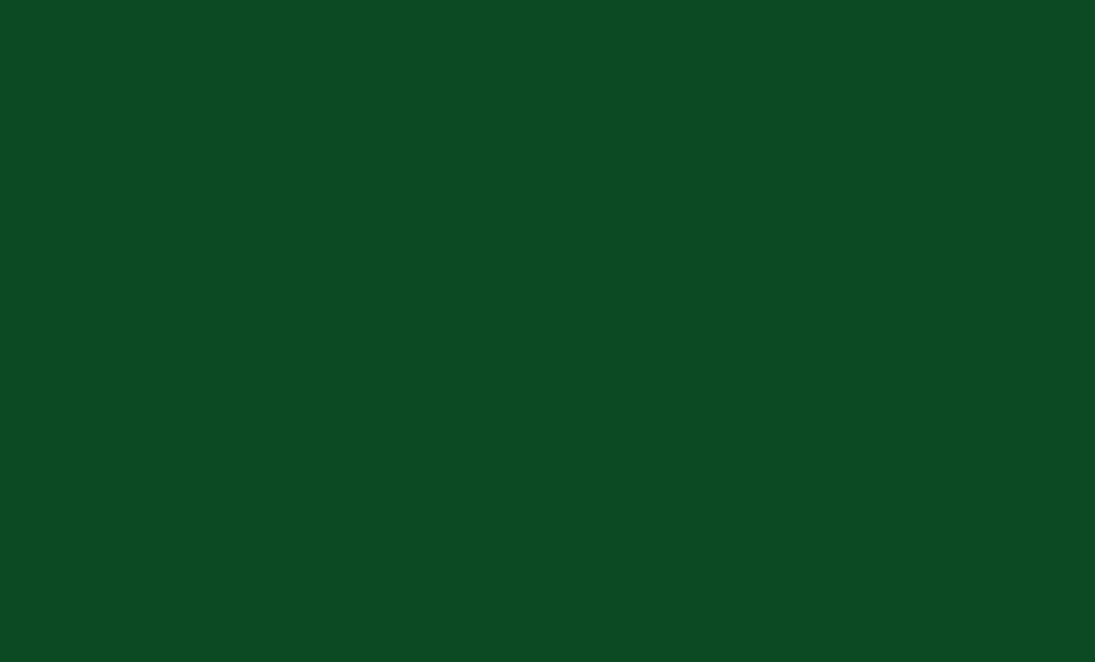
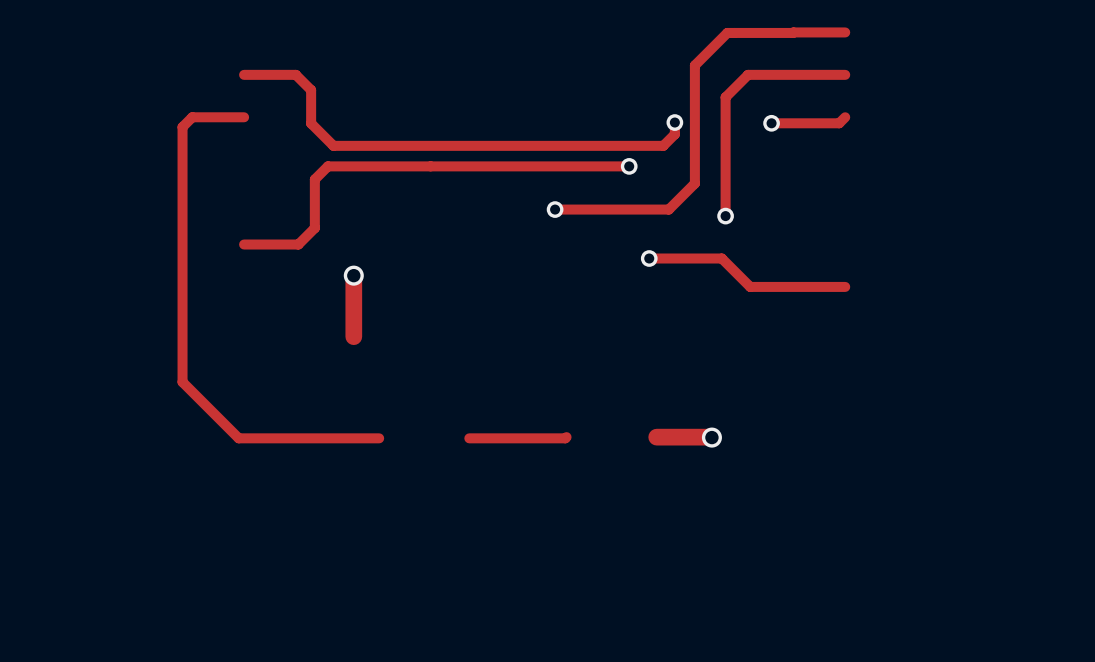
track: none -> (845, 32) (727, 32) (694, 65) (694, 183) (668, 209) (555, 209)
track: none -> (244, 74) (295, 74) (311, 90) (311, 123) (333, 145) (663, 145) (674, 134) (674, 122)
track: none -> (845, 74) (748, 74) (725, 97) (725, 216)
track: none -> (244, 117) (192, 117) (182, 127) (182, 382) (238, 438) (379, 438)
track: none -> (845, 117) (839, 123) (771, 123)
via: none -> (674, 122)
via: none -> (771, 123)
track: none -> (629, 166) (327, 166) (314, 179) (314, 228) (298, 244) (244, 244)
via: none -> (629, 166)
via: none -> (555, 209)
via: none -> (725, 216)
track: none -> (649, 258) (721, 258) (750, 286) (845, 286)
via: none -> (649, 258)
track: none -> (353, 275) (353, 336)
via: none -> (353, 275)
track: none -> (566, 437) (469, 438)
track: none -> (656, 437) (711, 437)
via: none -> (711, 437)

